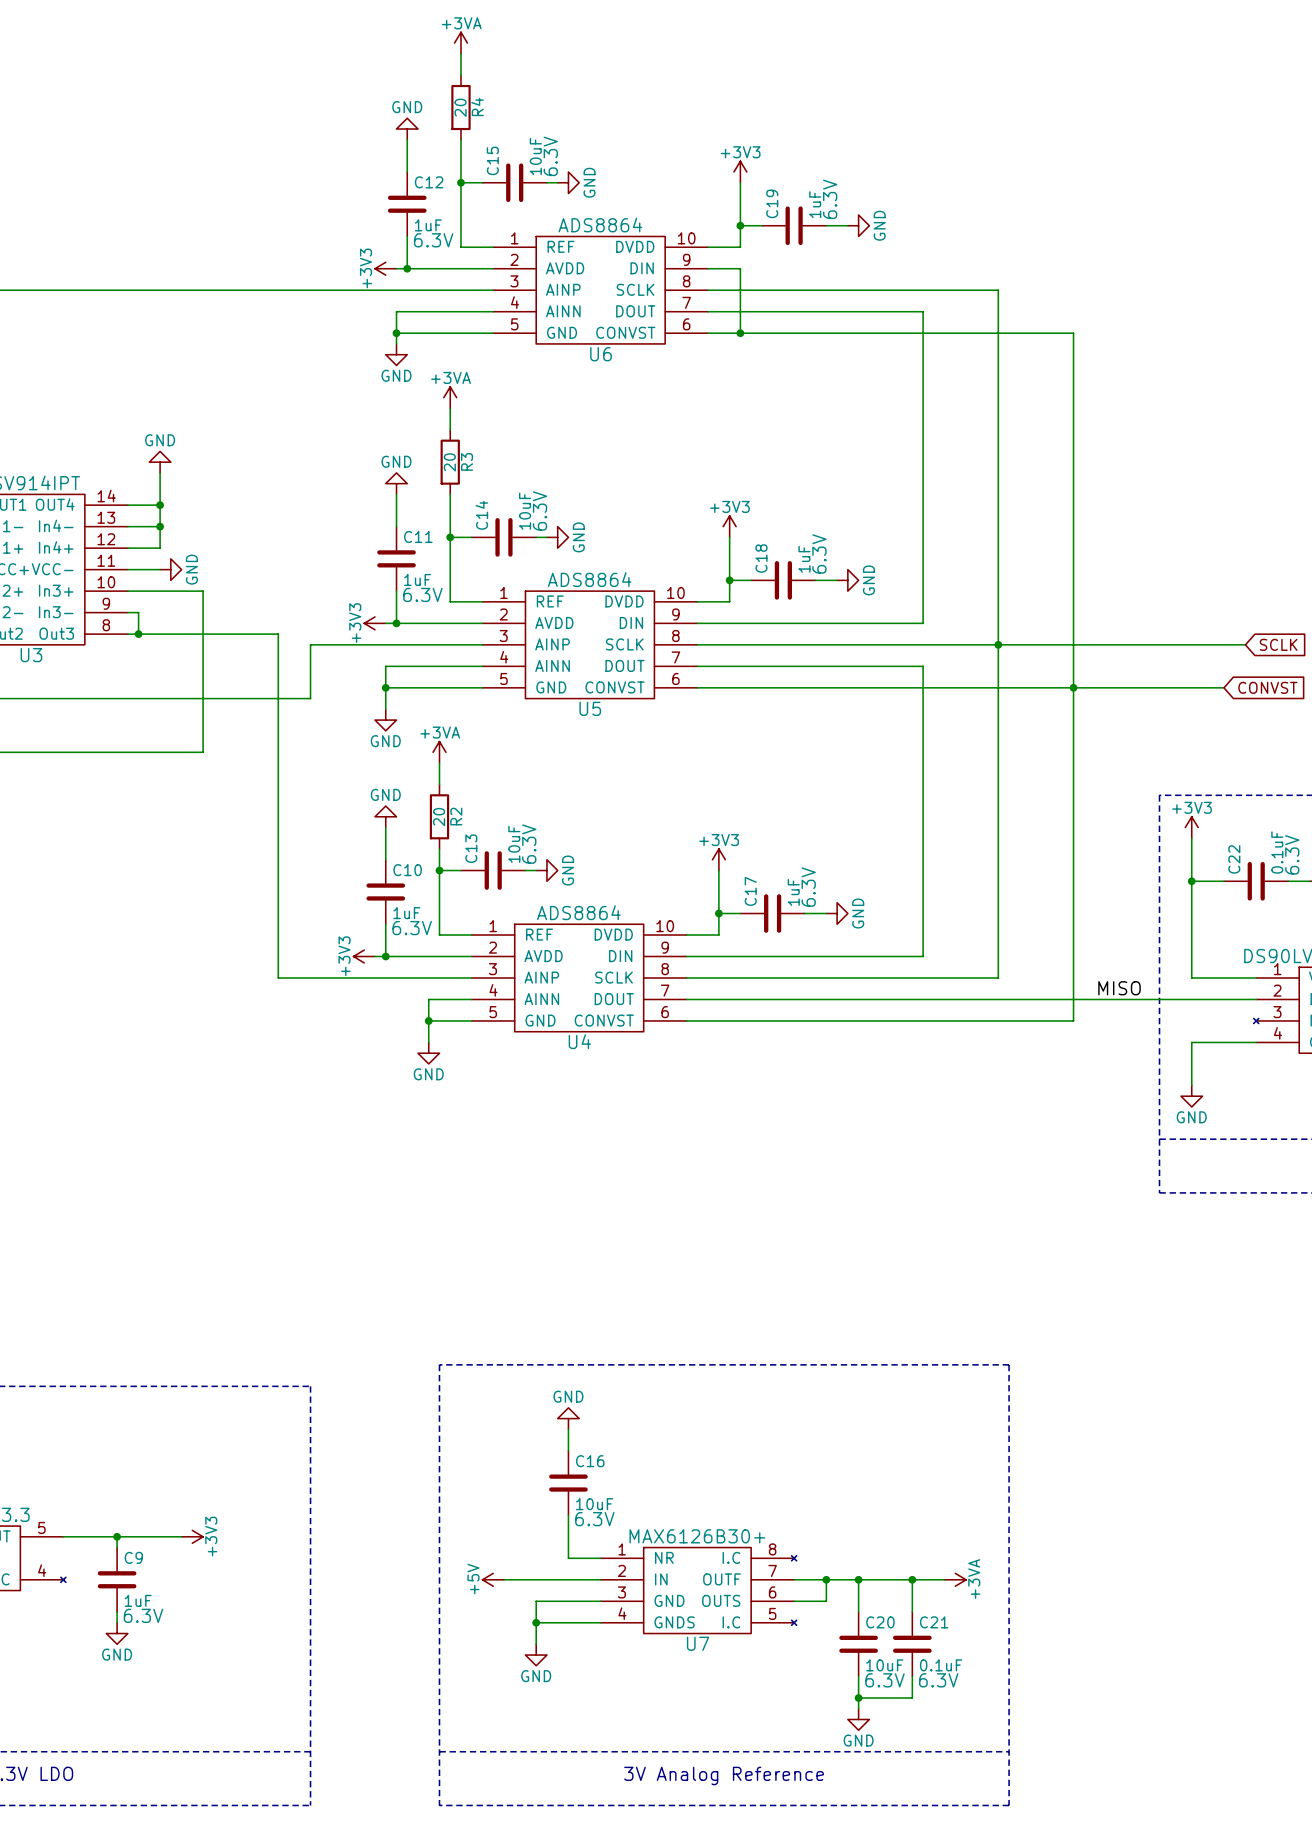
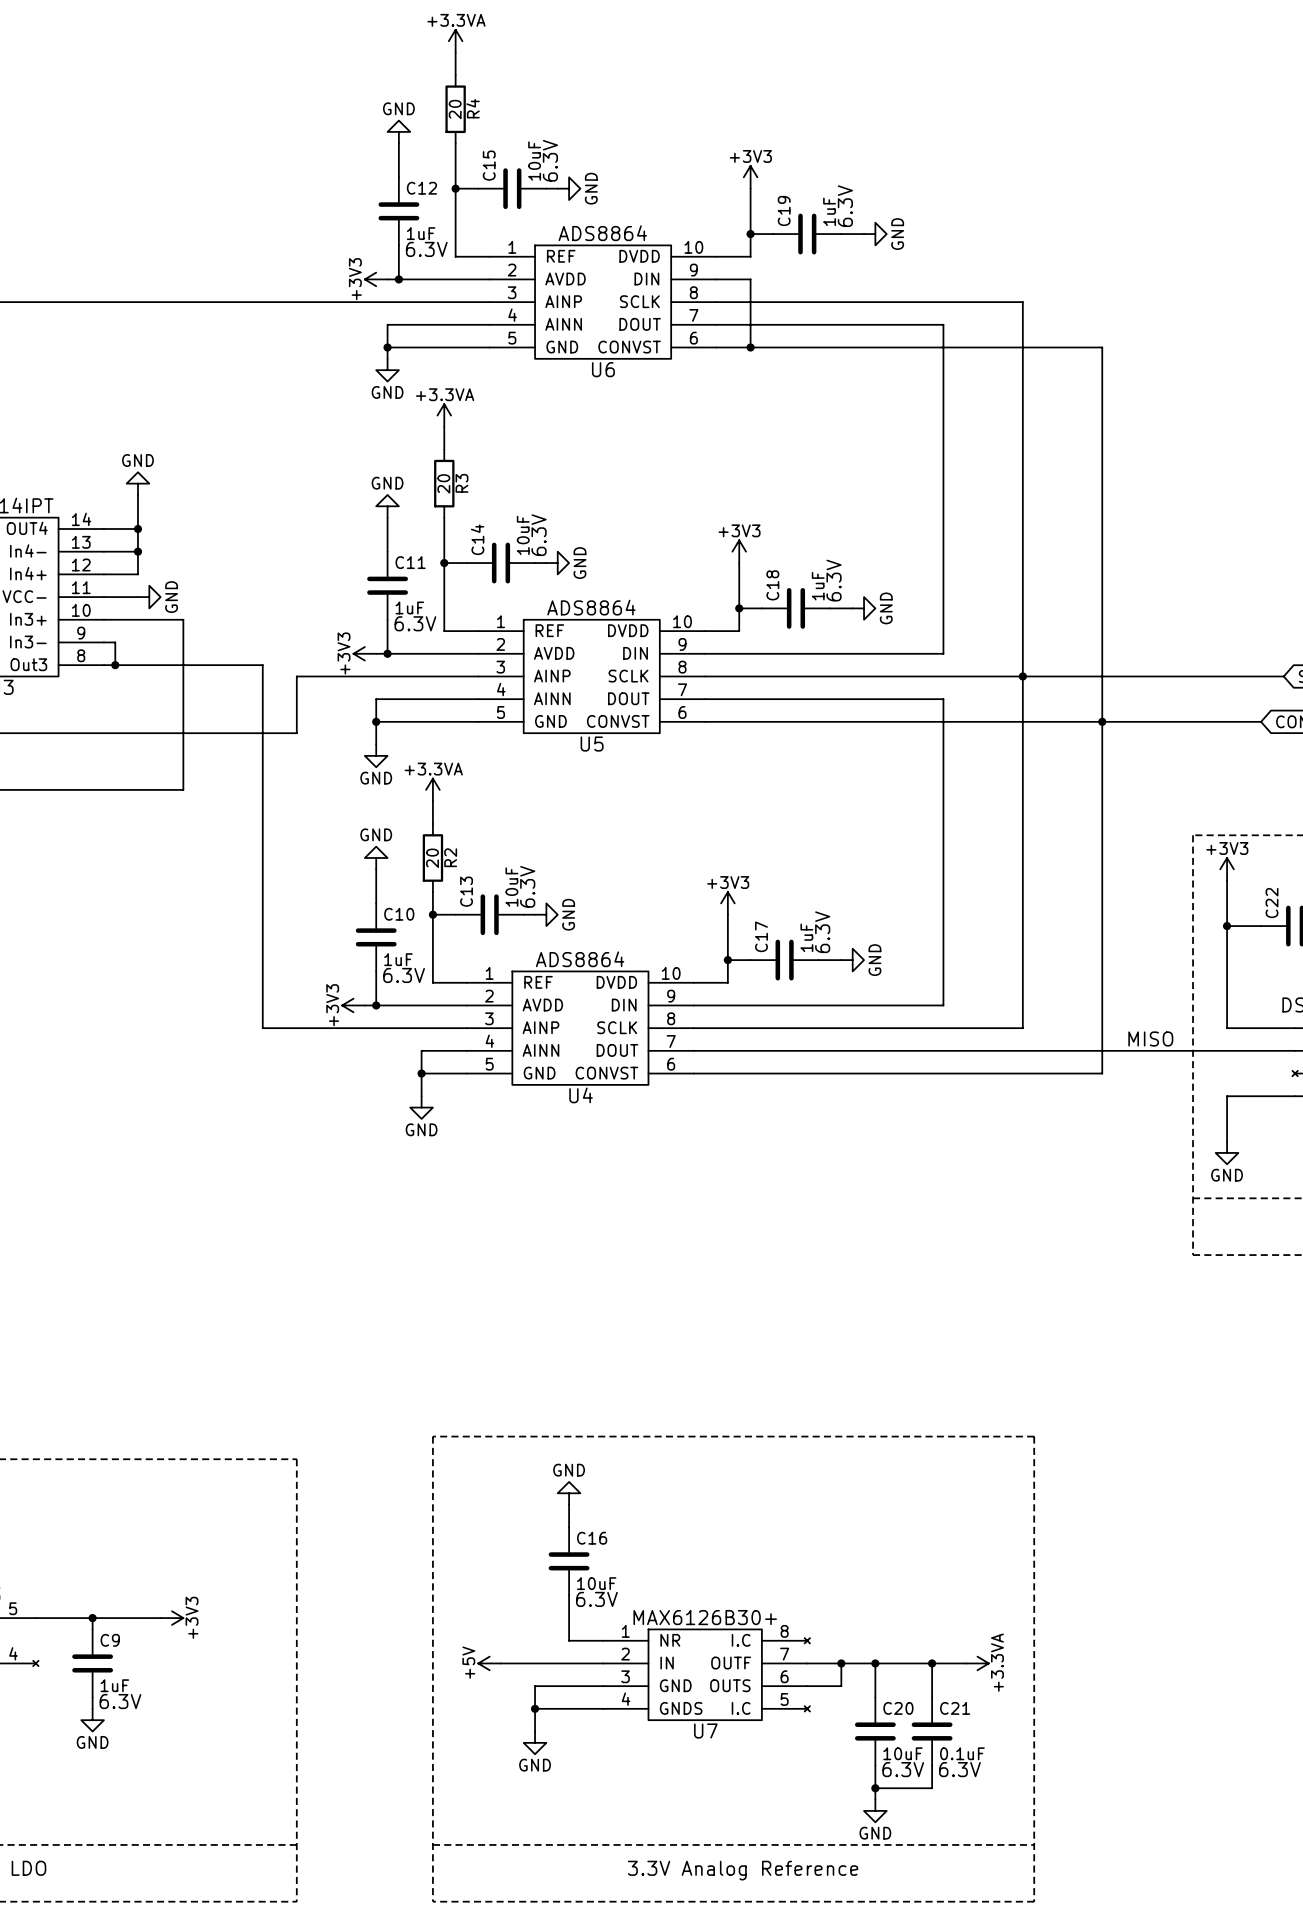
power symbol: +3VA (460, 43) -> +3.3VA (455, 41)
power symbol: +3VA (450, 397) -> +3.3VA (444, 415)
power symbol: +3VA (439, 752) -> +3.3VA (432, 789)
power symbol: +3VA (955, 1579) -> +3.3VA (977, 1663)
text: 3V Analog Reference (724, 1775) -> 3.3V Analog Reference (743, 1870)

